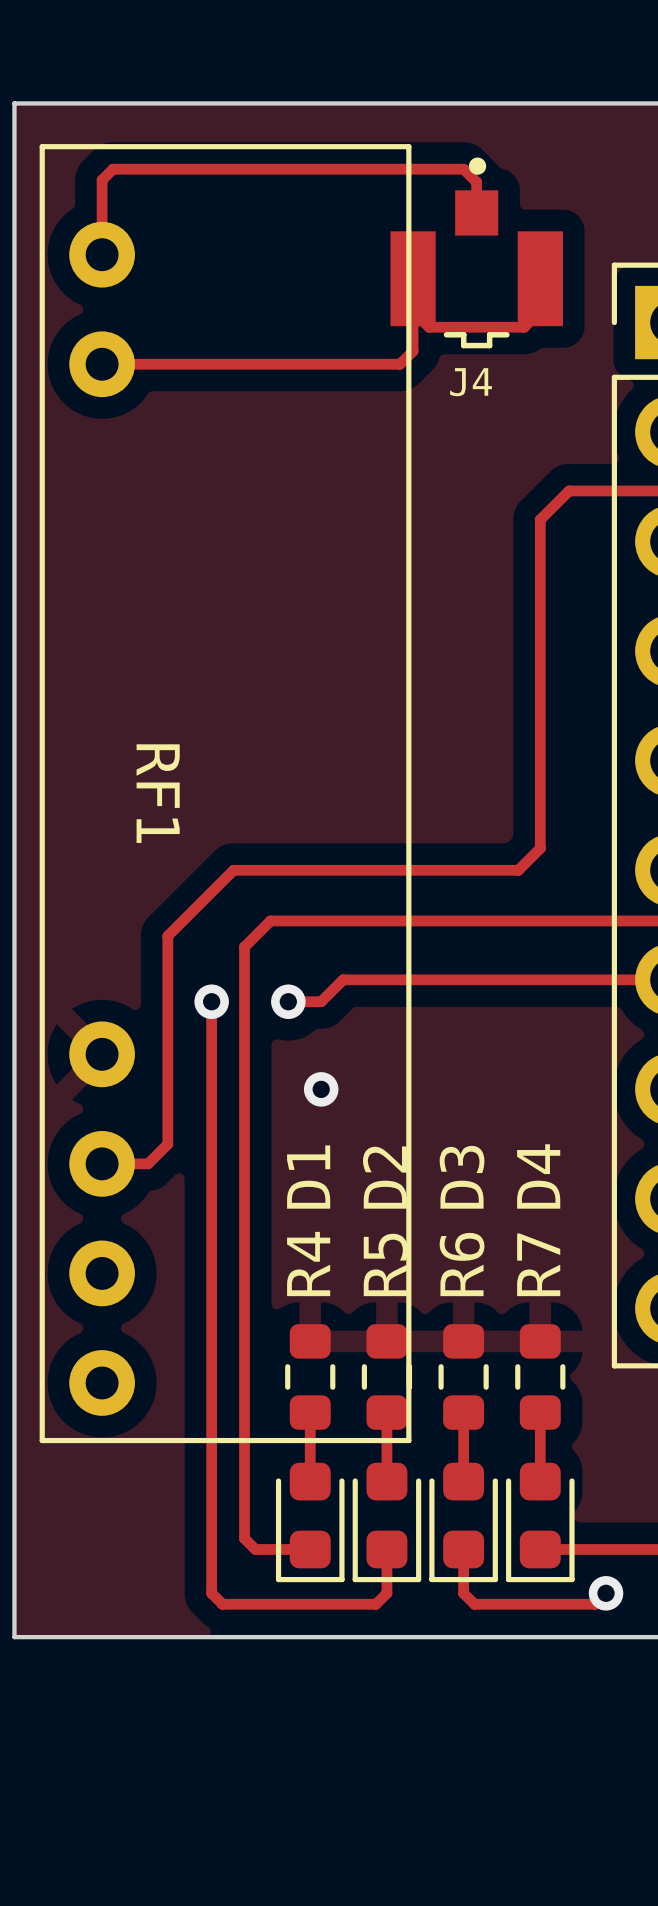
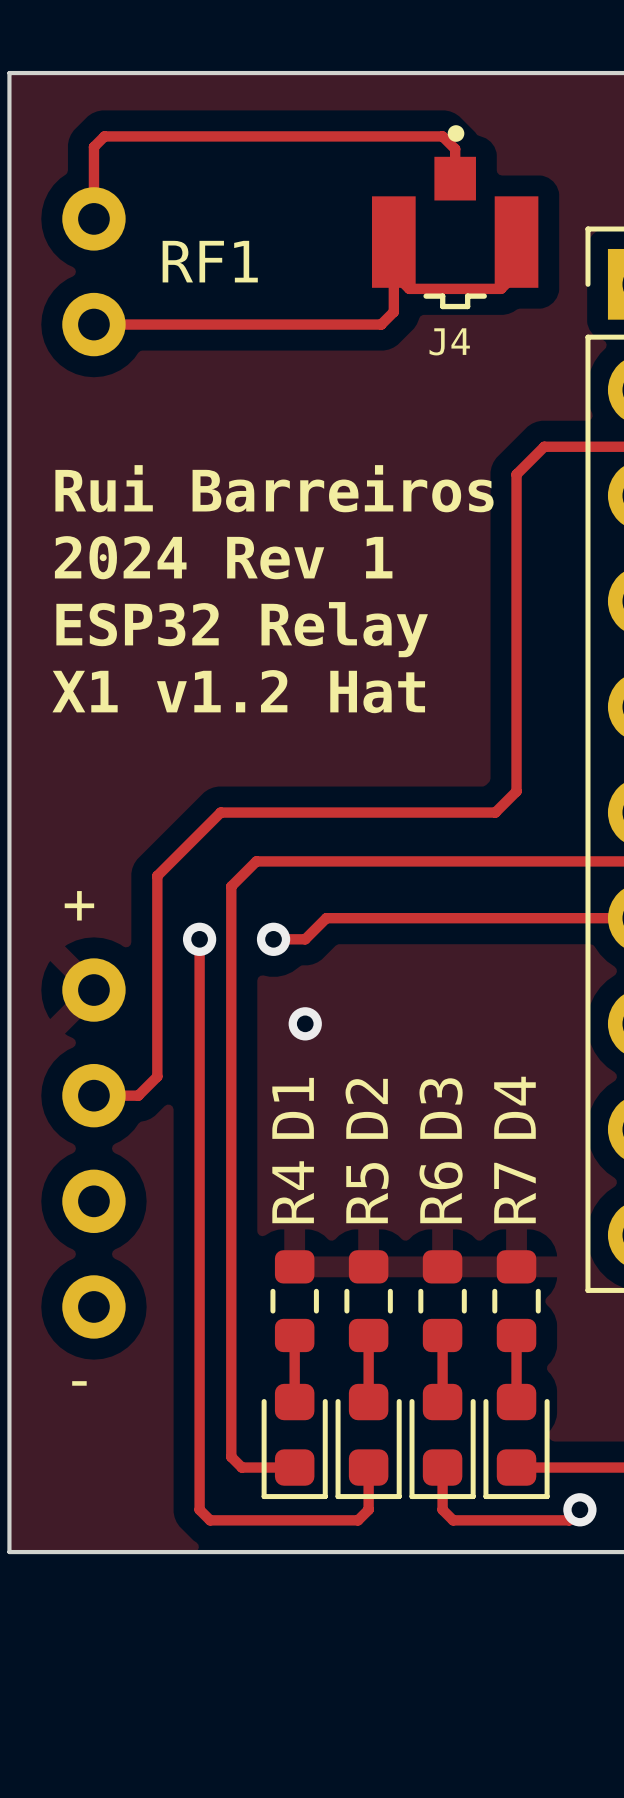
RF1 footprint: [39, 144, 412, 1444] -> [62, 187, 126, 1339]
text: none -> Rui Barreiros (274, 488)
text: none -> 2024 Rev 1 (223, 557)
text: none -> ESP32 Relay (242, 629)
text: none -> X1 v1.2 Hat (238, 691)
RF1 name position: RF1 (158, 793) -> RF1 (210, 261)
text: none -> + (79, 905)
text: none -> - (79, 1383)

